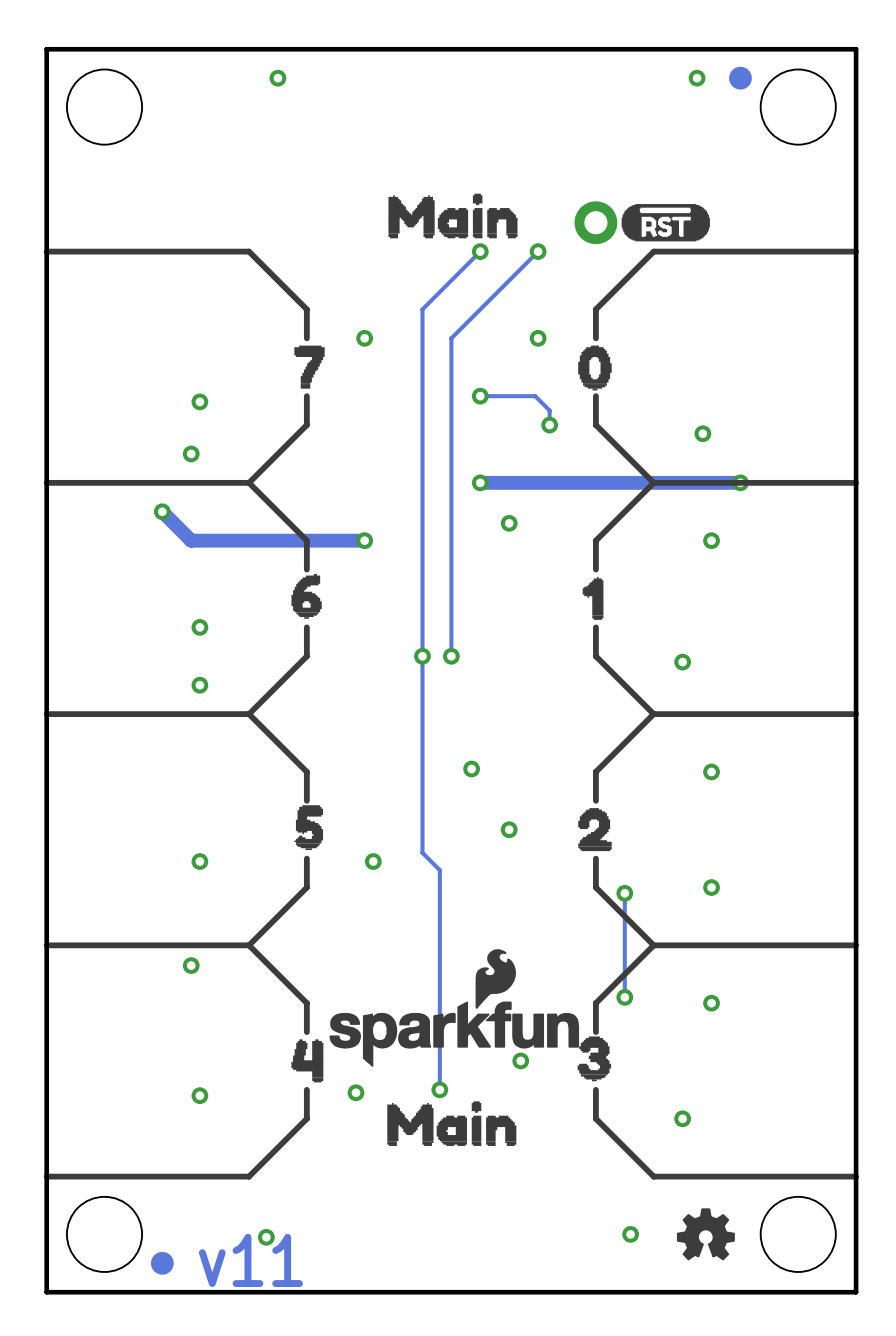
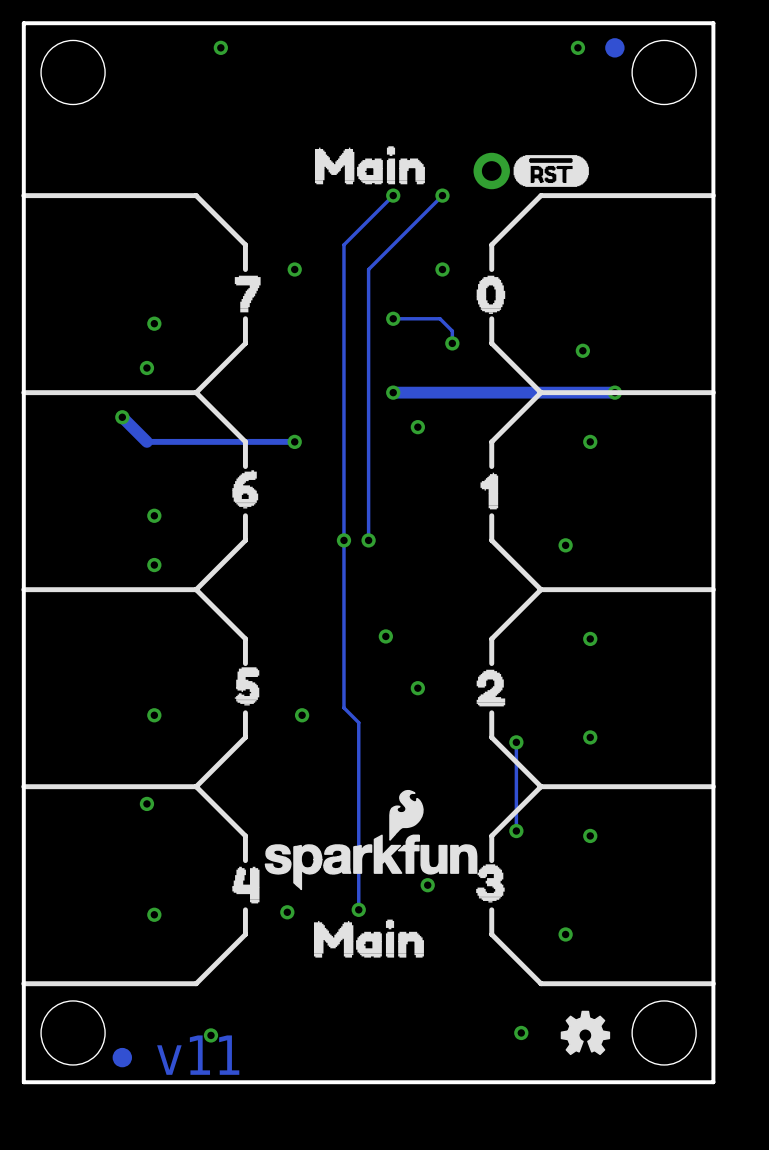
track width: thick (364, 540) (191, 540) -> thin (294, 441) (146, 441)

